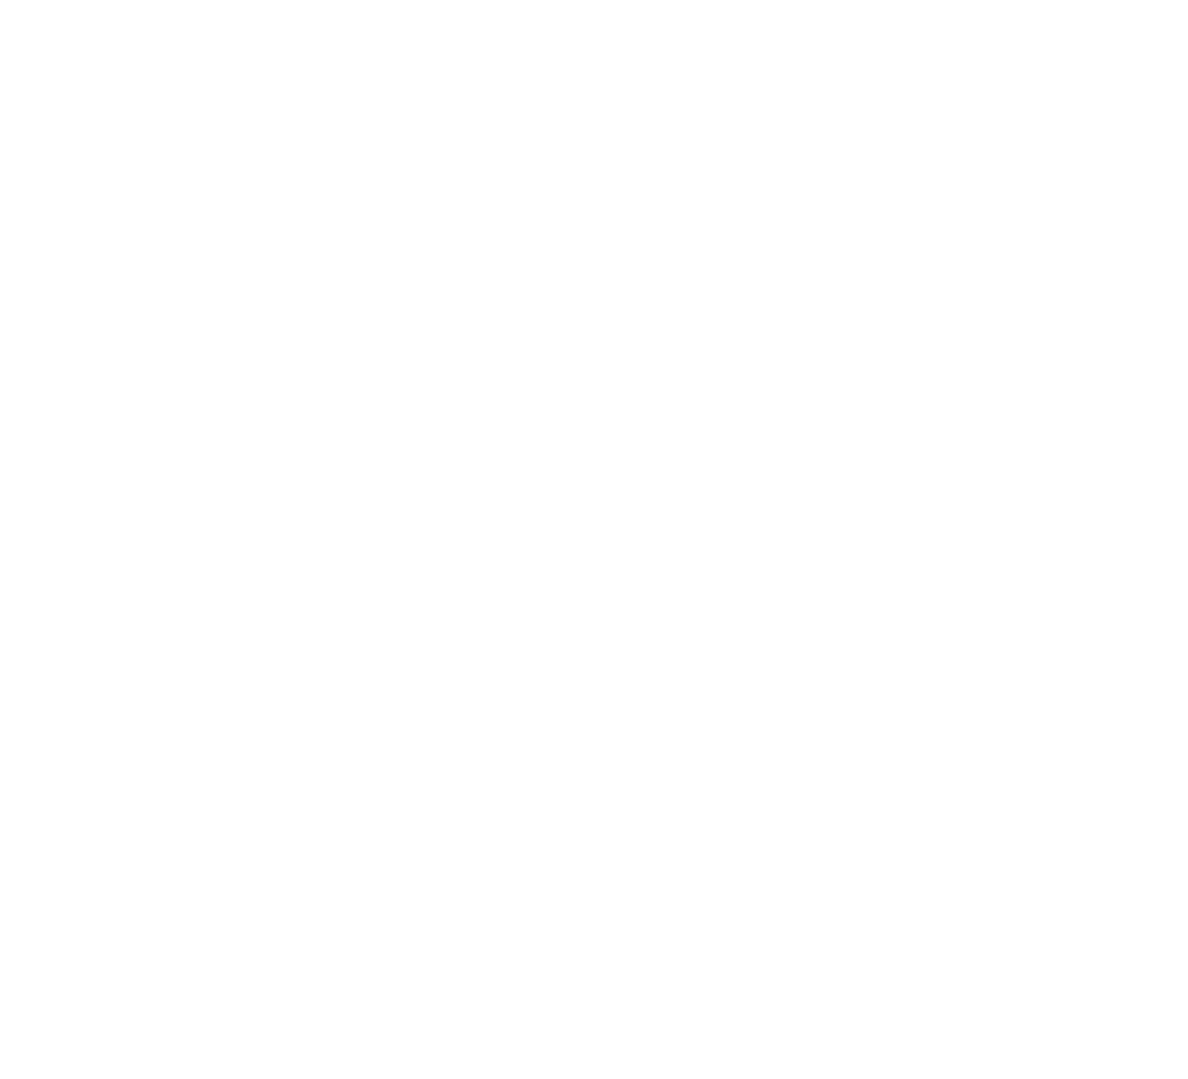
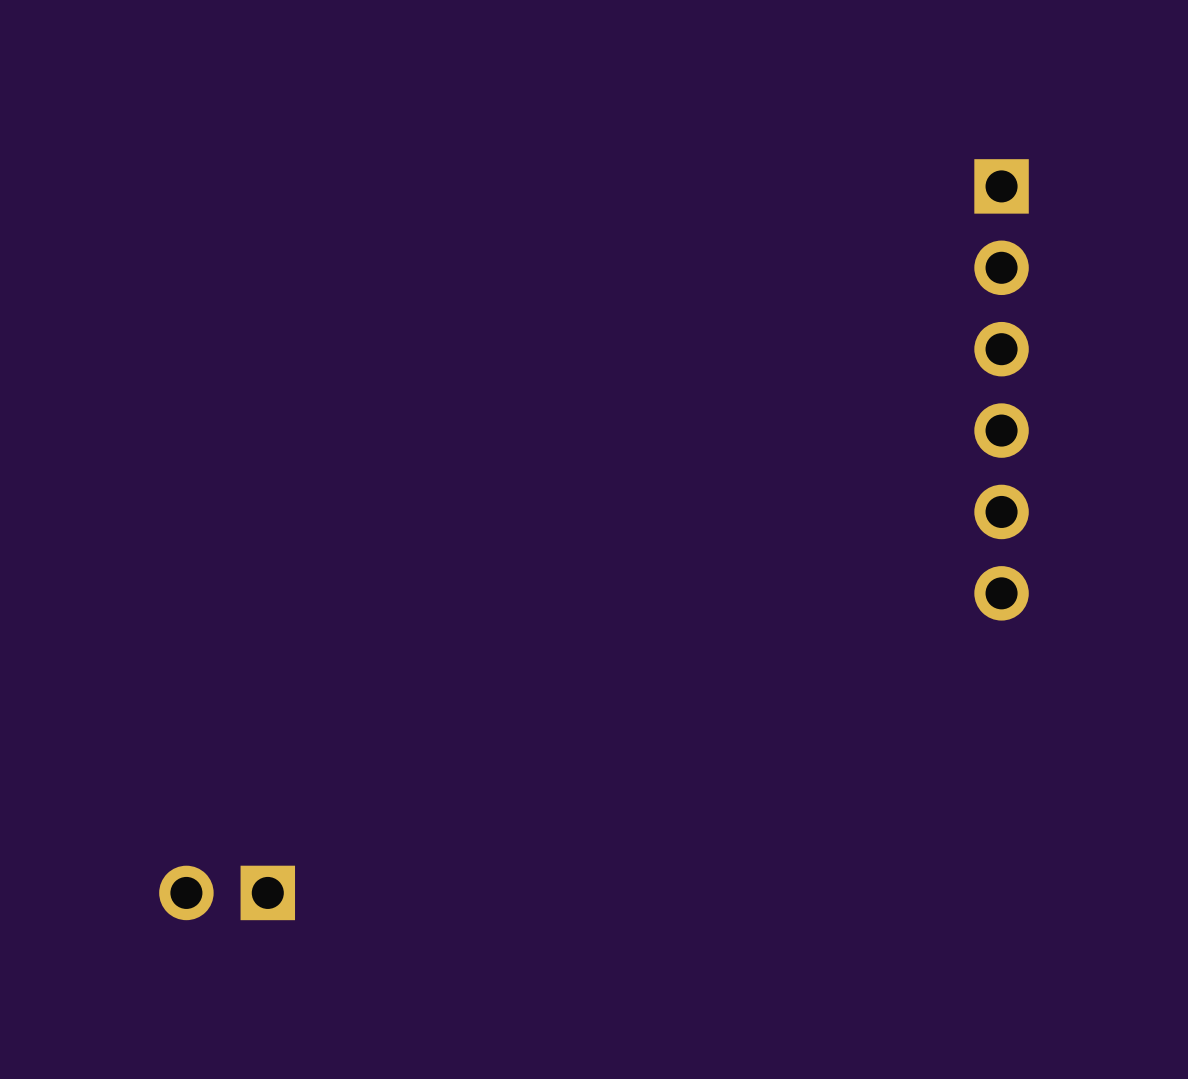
part: none -> (1001, 389)
part: none -> (227, 892)

